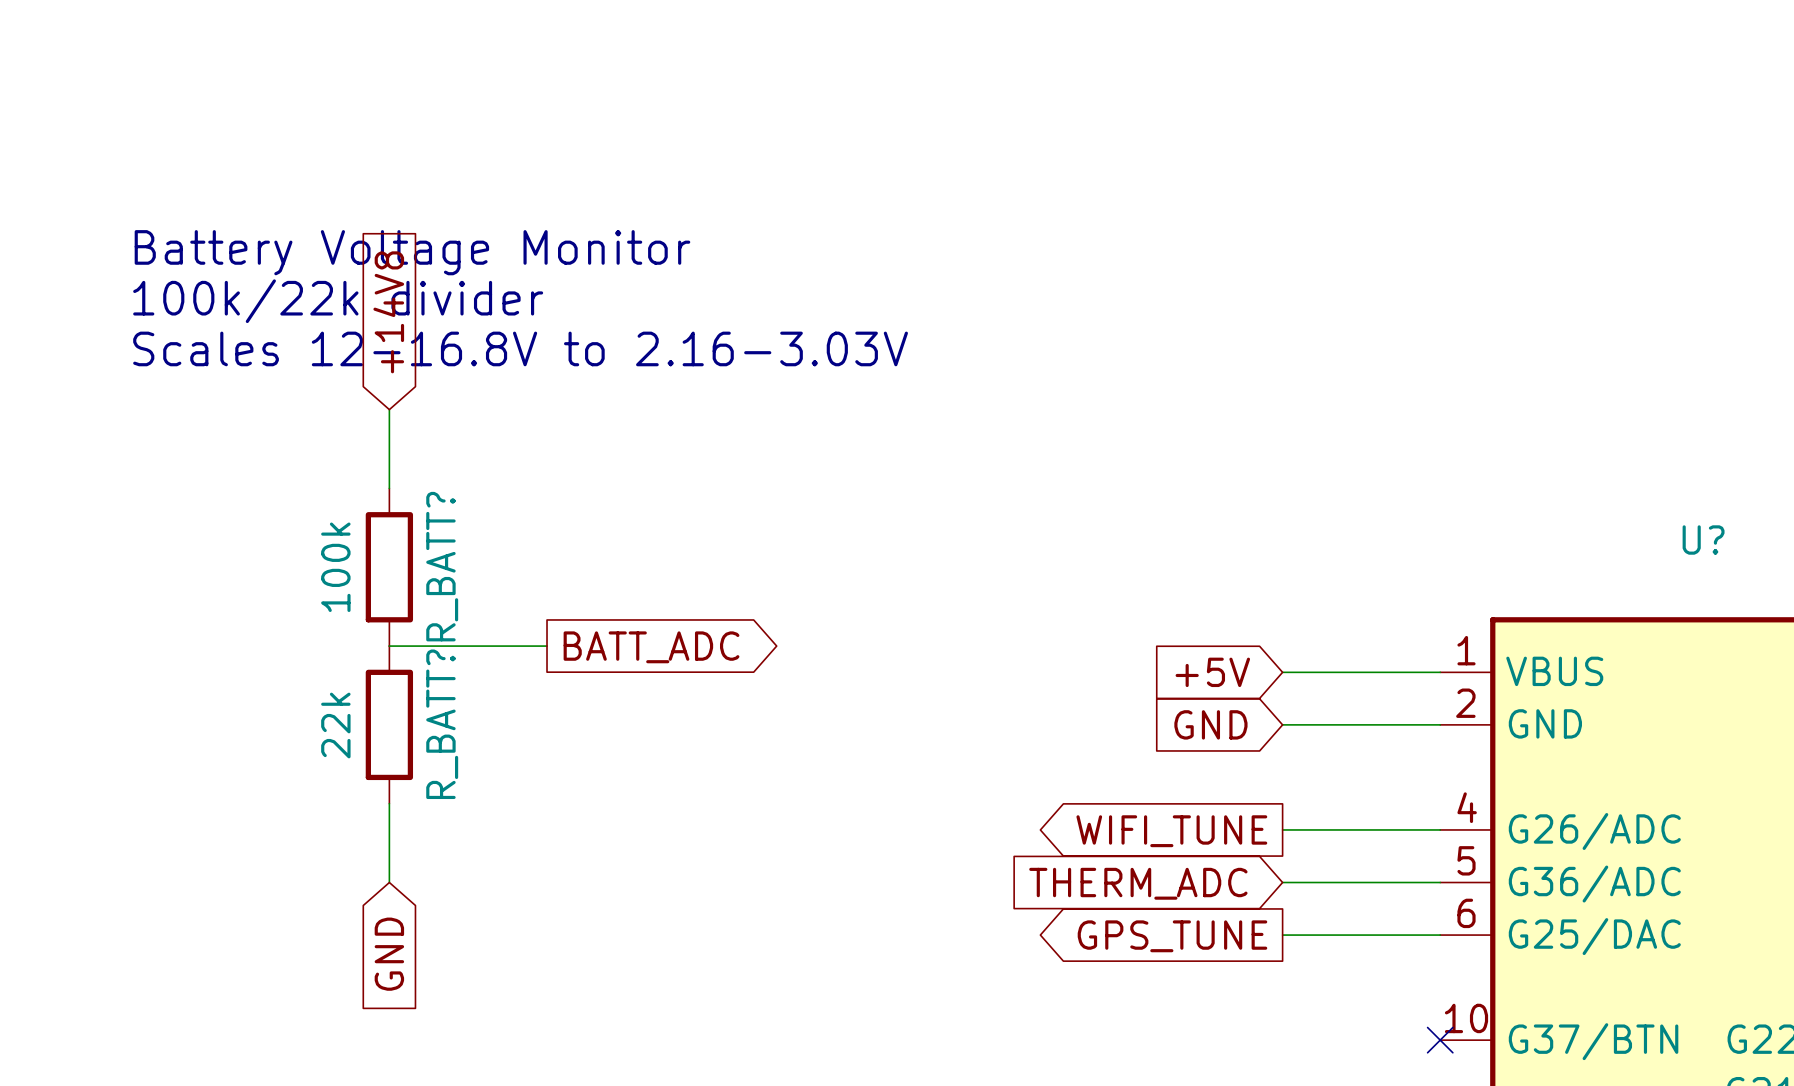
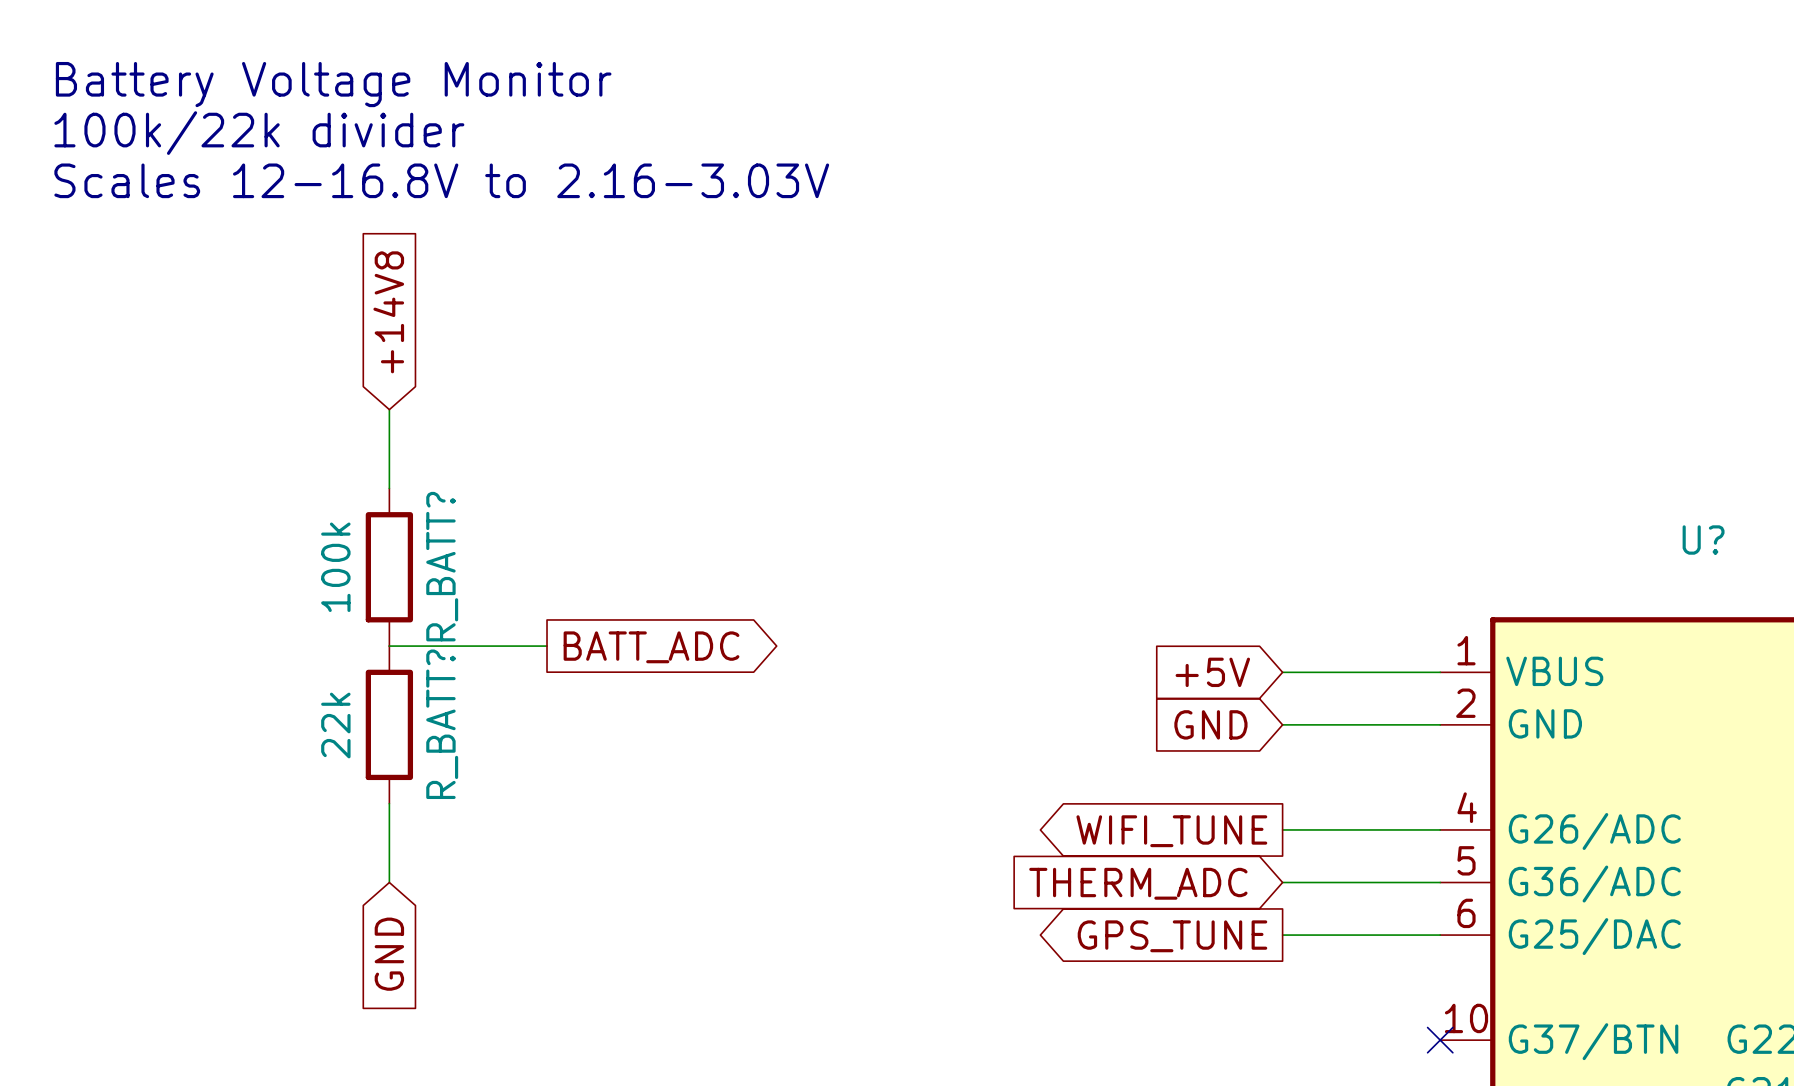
text position: Battery Voltage Monitor (412, 252) -> Battery Voltage Monitor (333, 84)
text position: 100k/22k divider (338, 301) -> 100k/22k divider (259, 133)
text position: Scales 12-16.8V to 2.16-3.03V (520, 348) -> Scales 12-16.8V to 2.16-3.03V (441, 180)

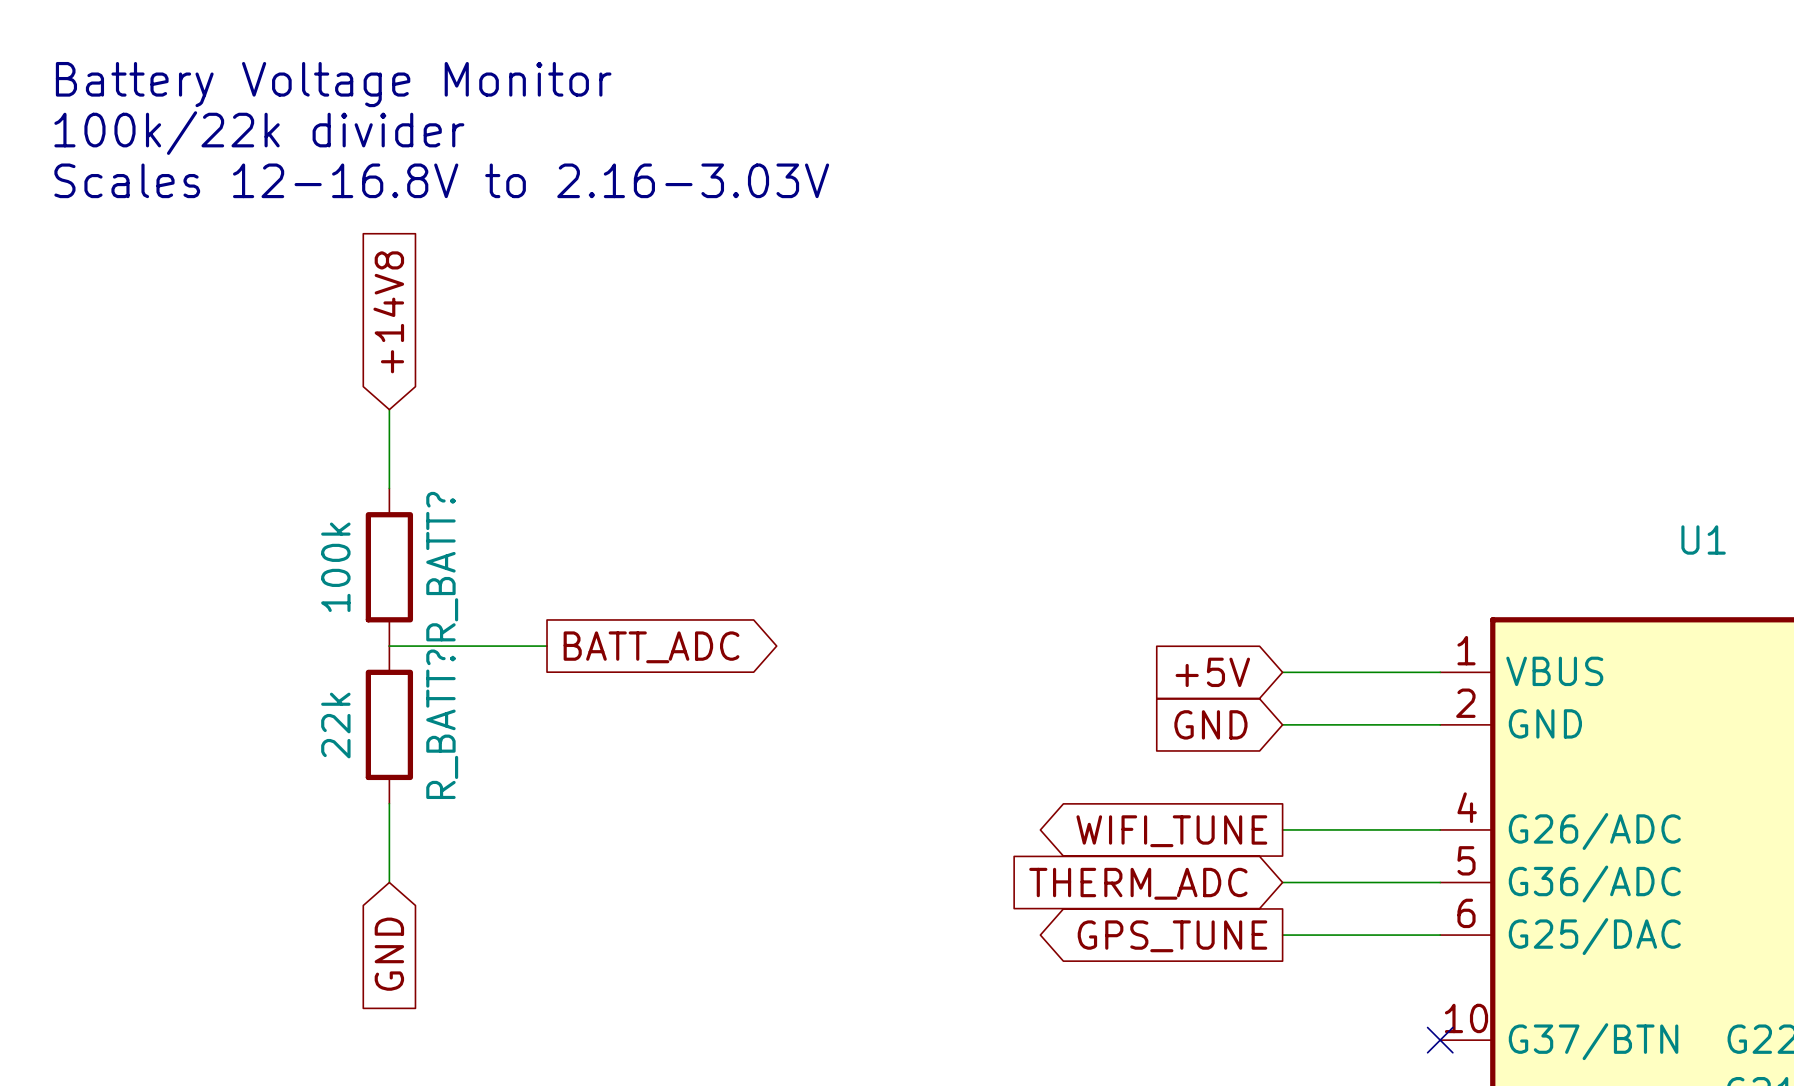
U? name: U? (1703, 540) -> U1 (1703, 540)

